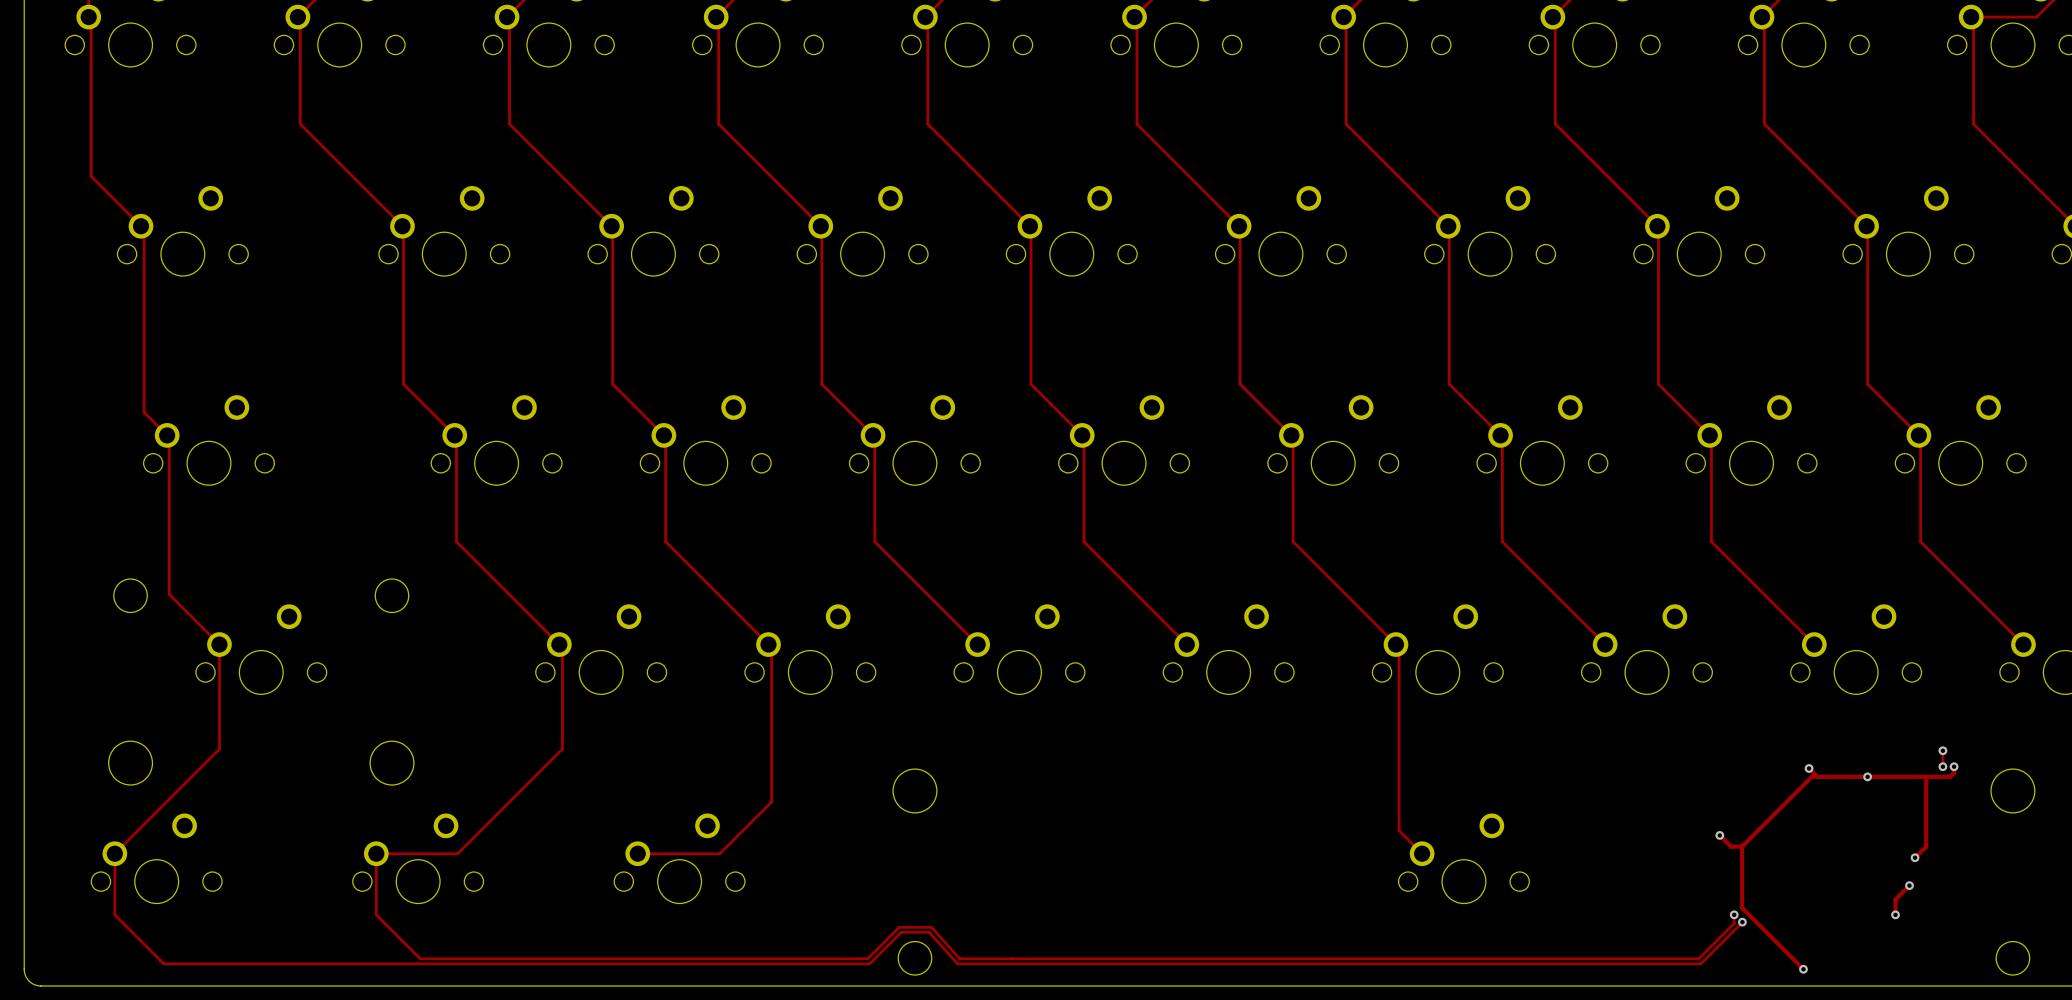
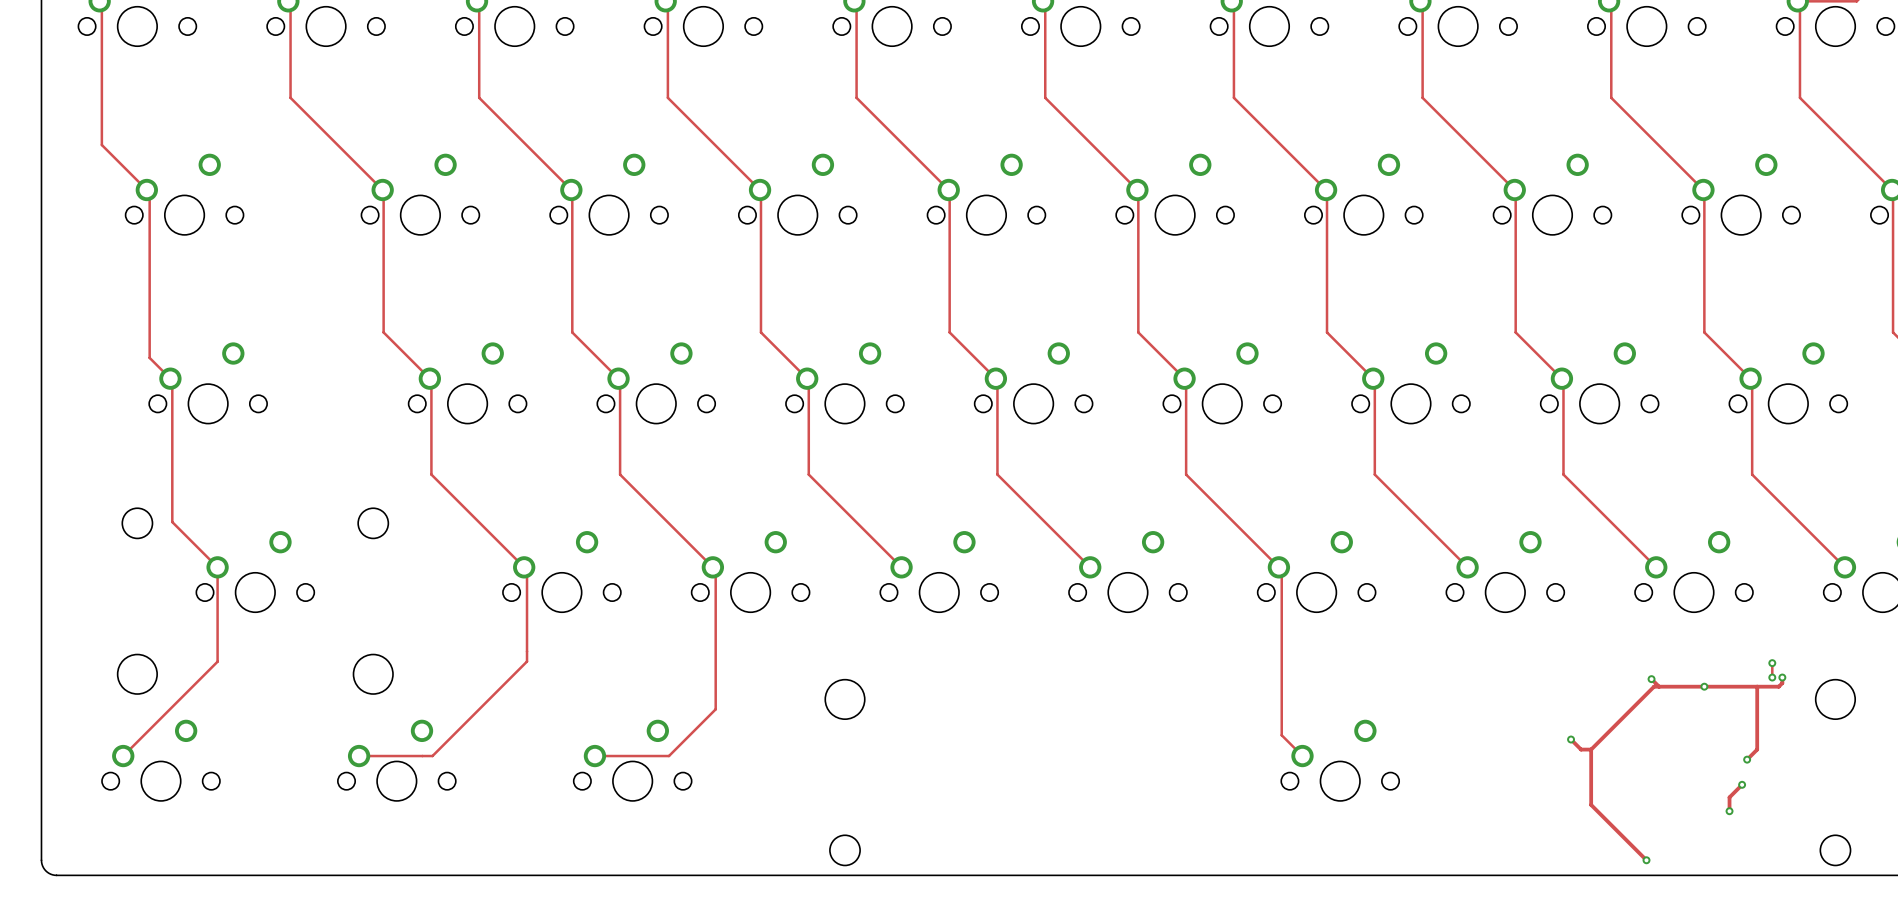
track: (114, 853) (114, 914) (163, 963) -> none
track: (376, 853) (376, 914) (420, 958) (867, 958) (899, 927) (931, 927) -> none
track: (1734, 914) (1734, 923) (1698, 958) (959, 958) (931, 927) -> none
via: (1734, 914) -> none
track: (1742, 922) (1700, 963) (957, 963) -> none
via: (1742, 922) -> none
track: (163, 963) (869, 963) -> none
track: (957, 963) (929, 932) (901, 932) (869, 963) -> none

